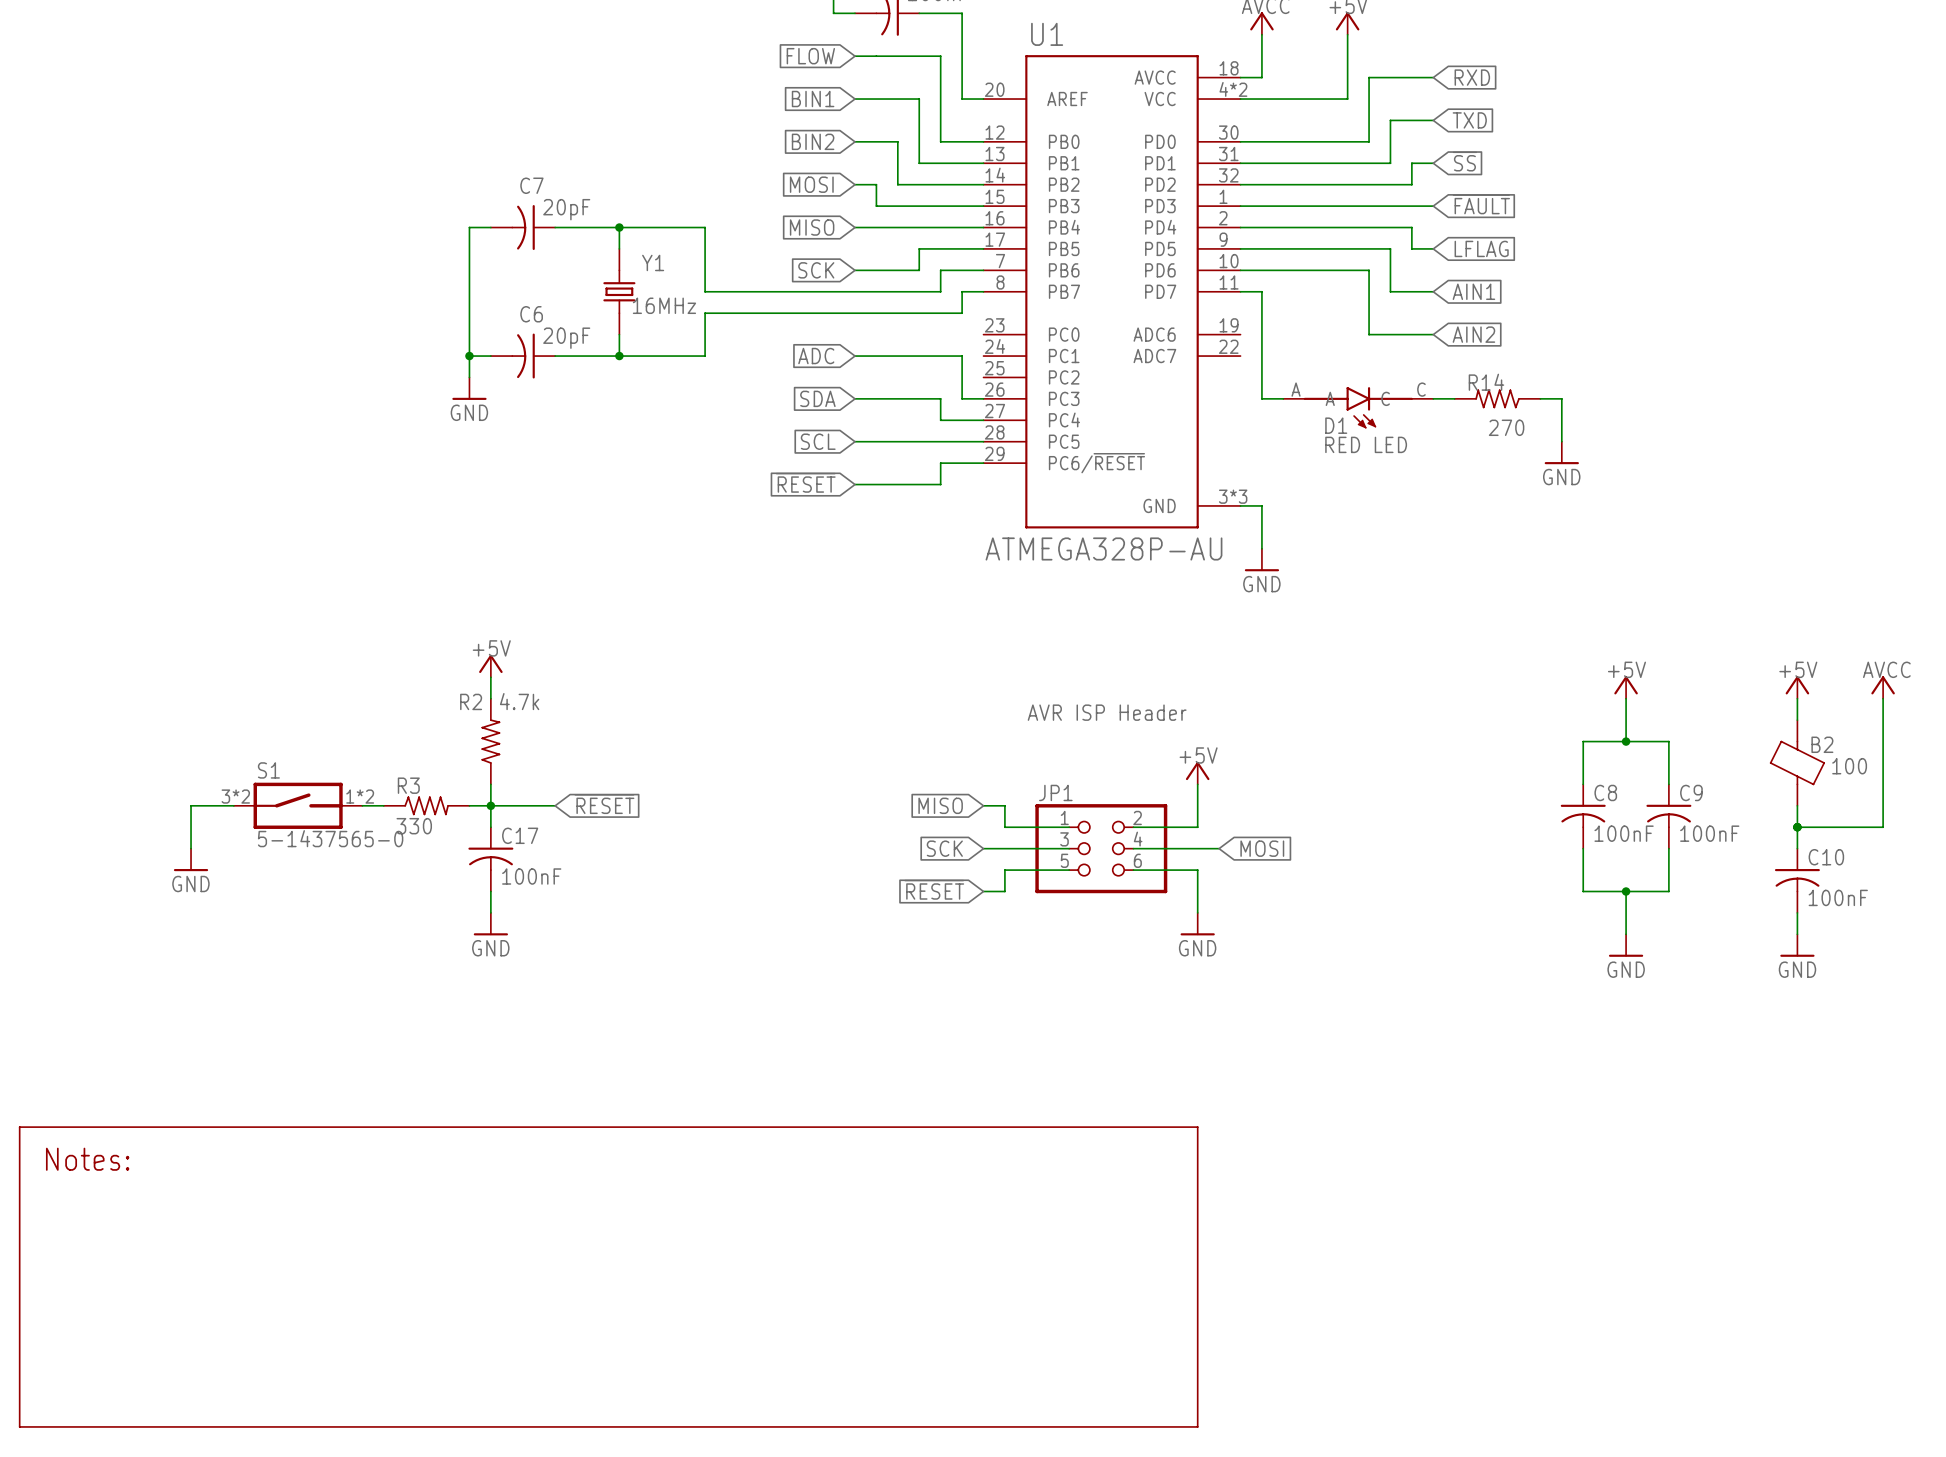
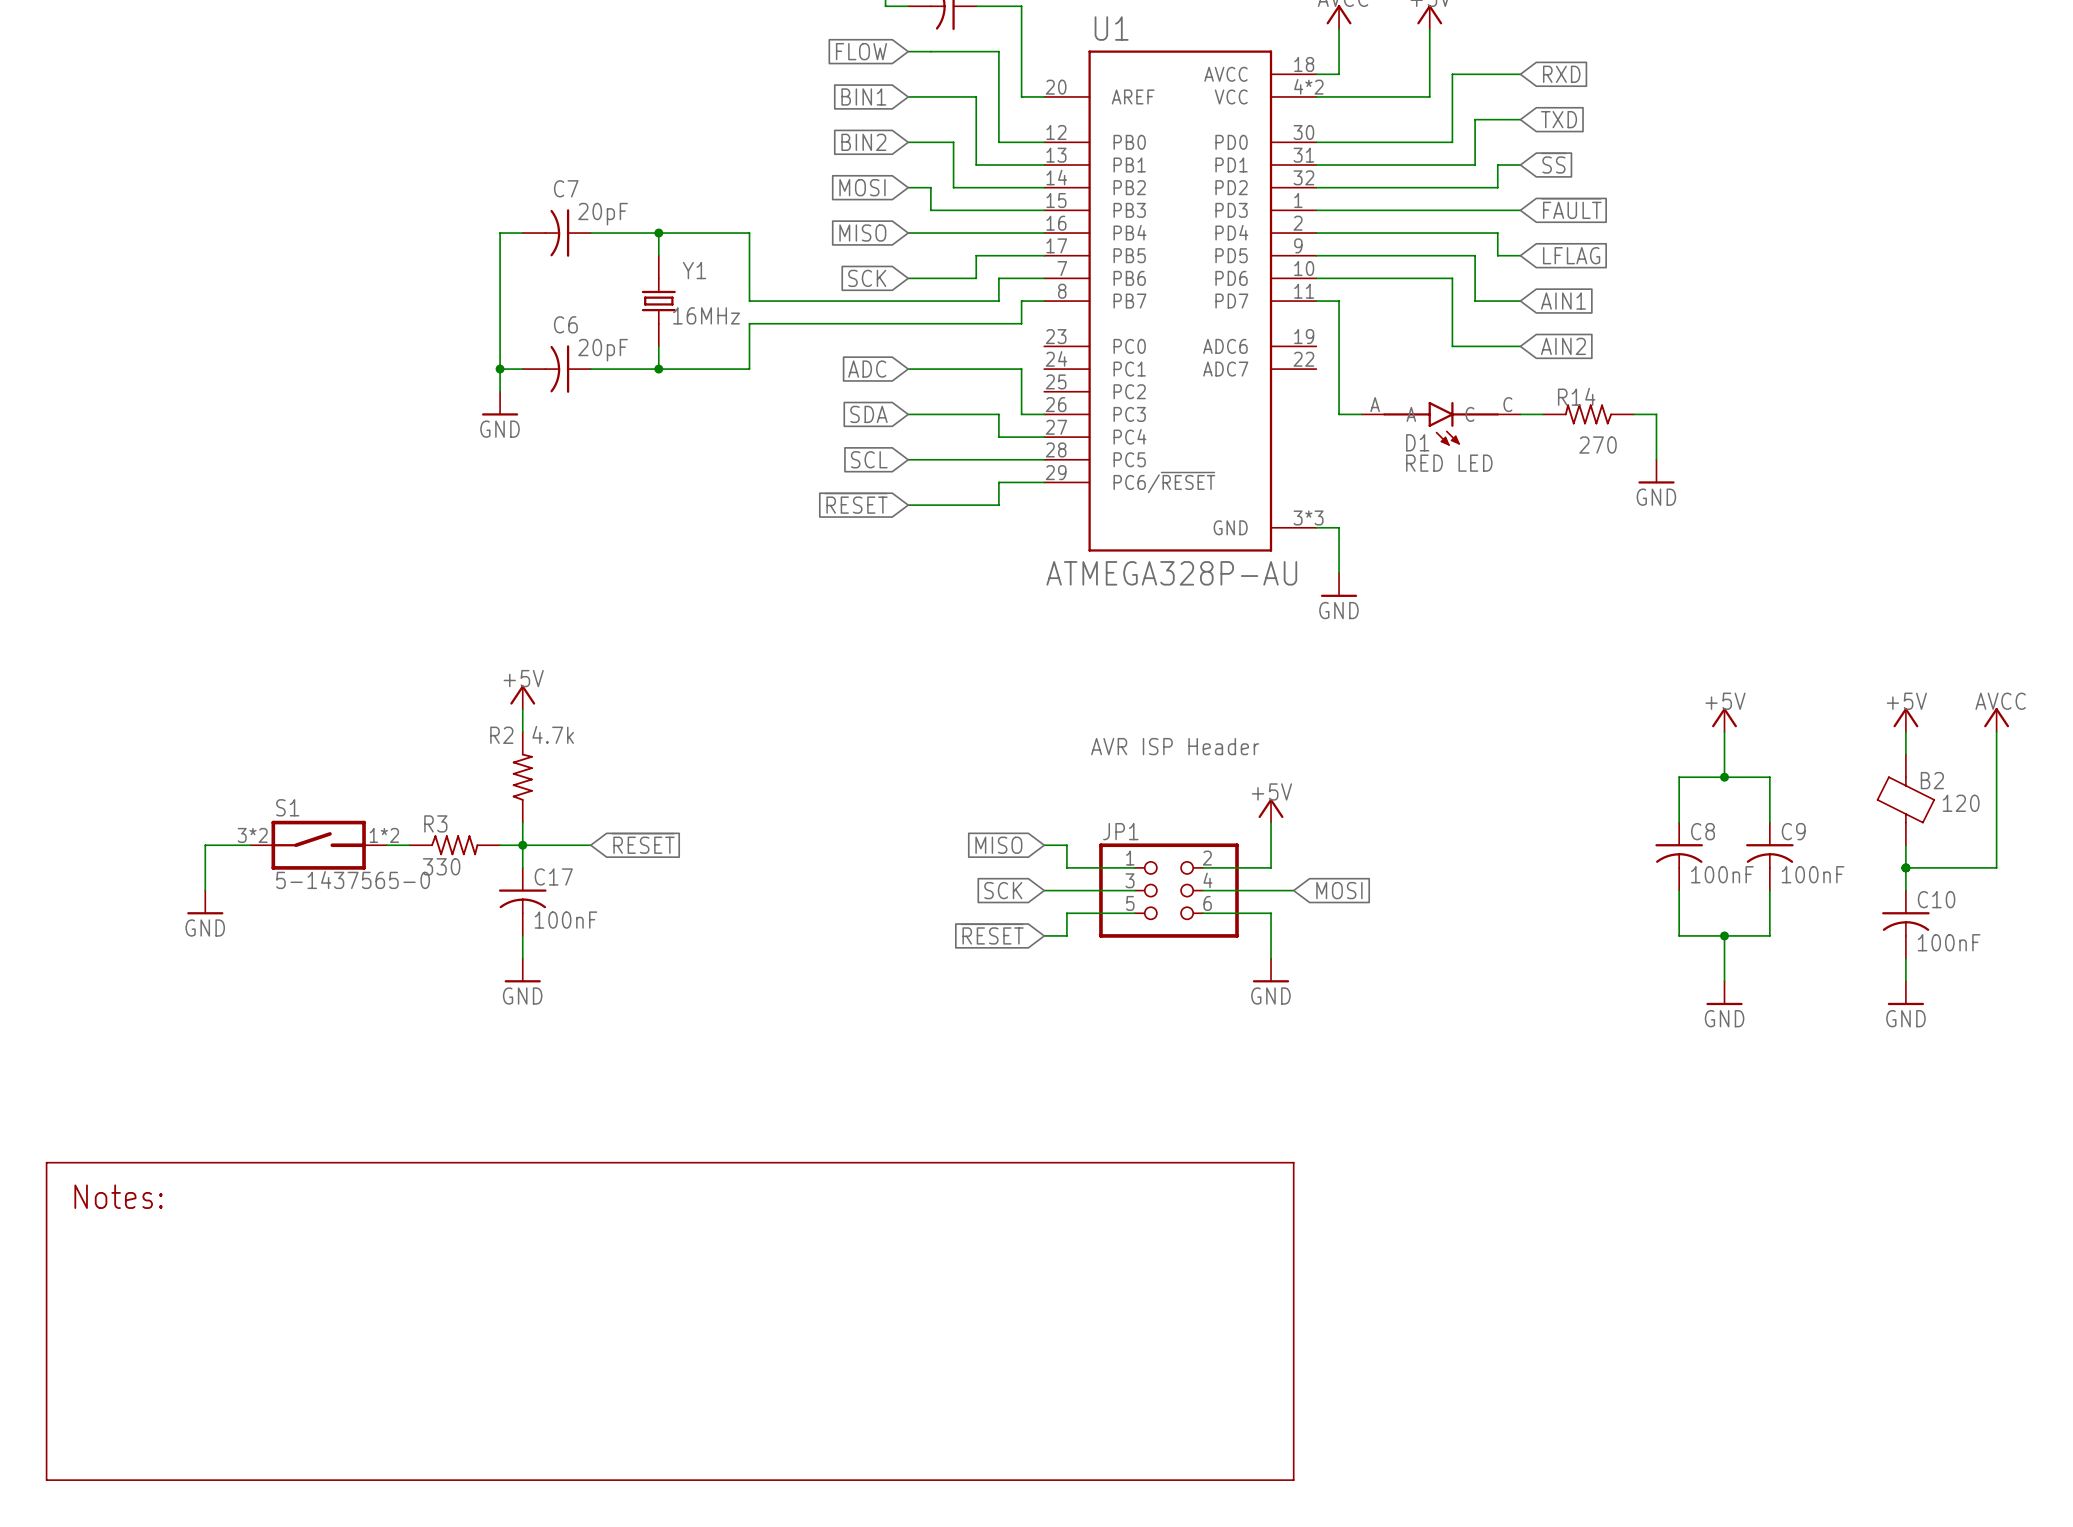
B2 value: 100 (1849, 766) -> 120 (1961, 803)
part position: (608, 1277) -> (670, 1321)

